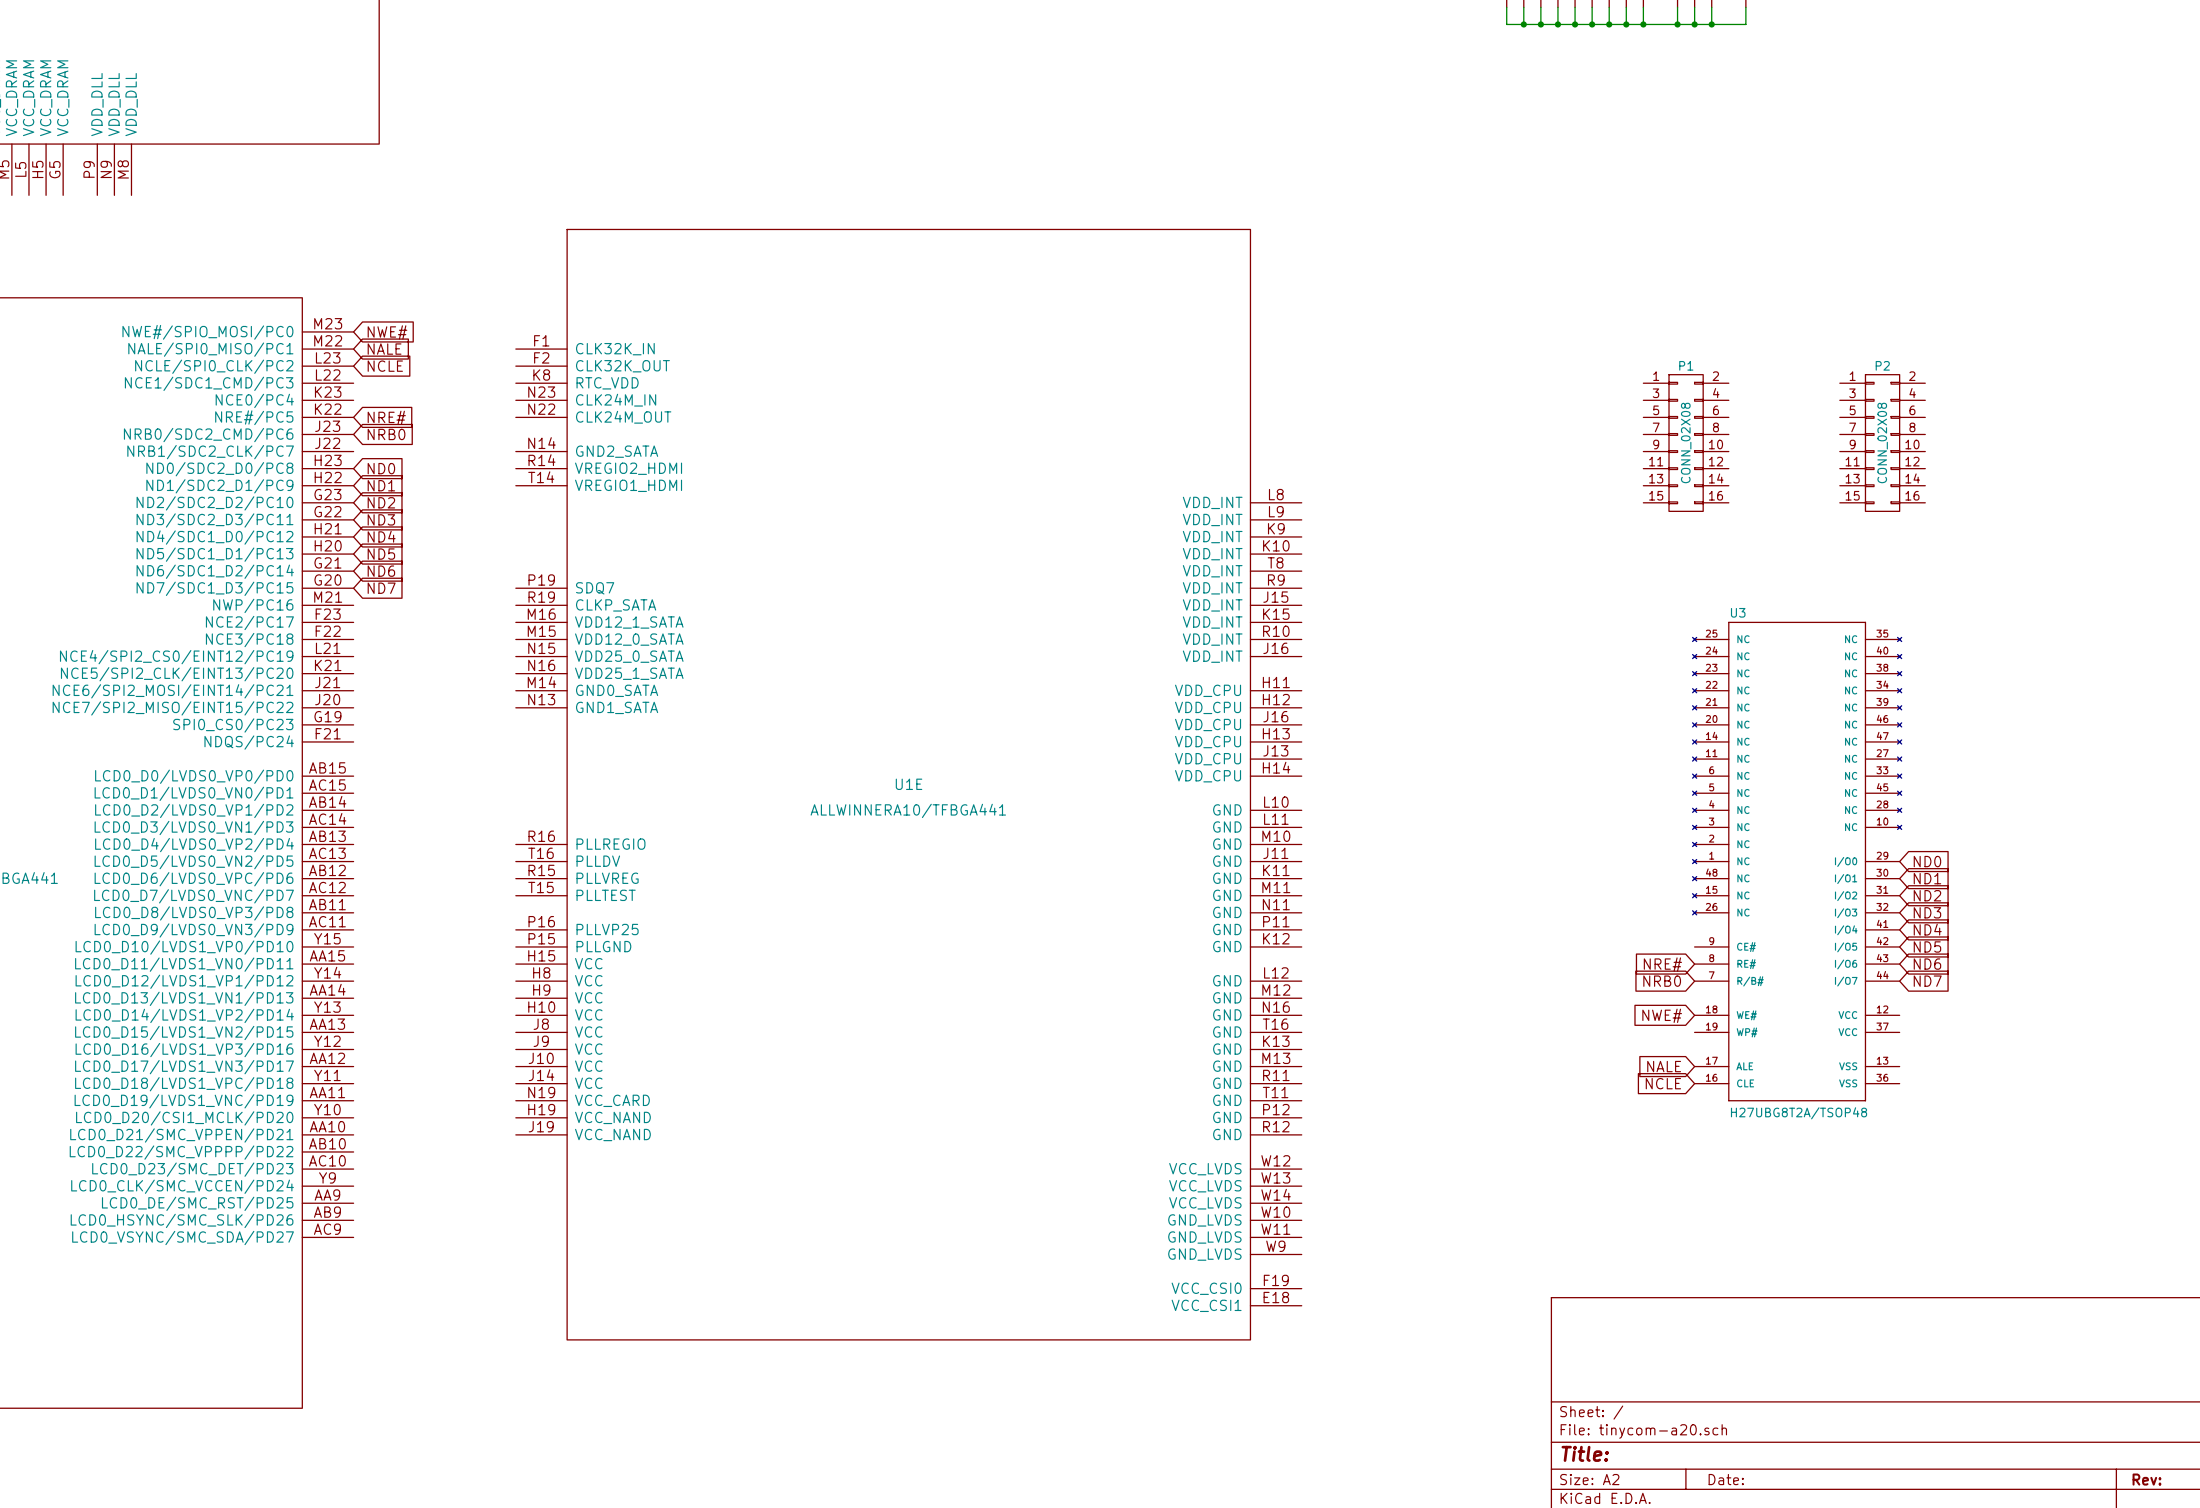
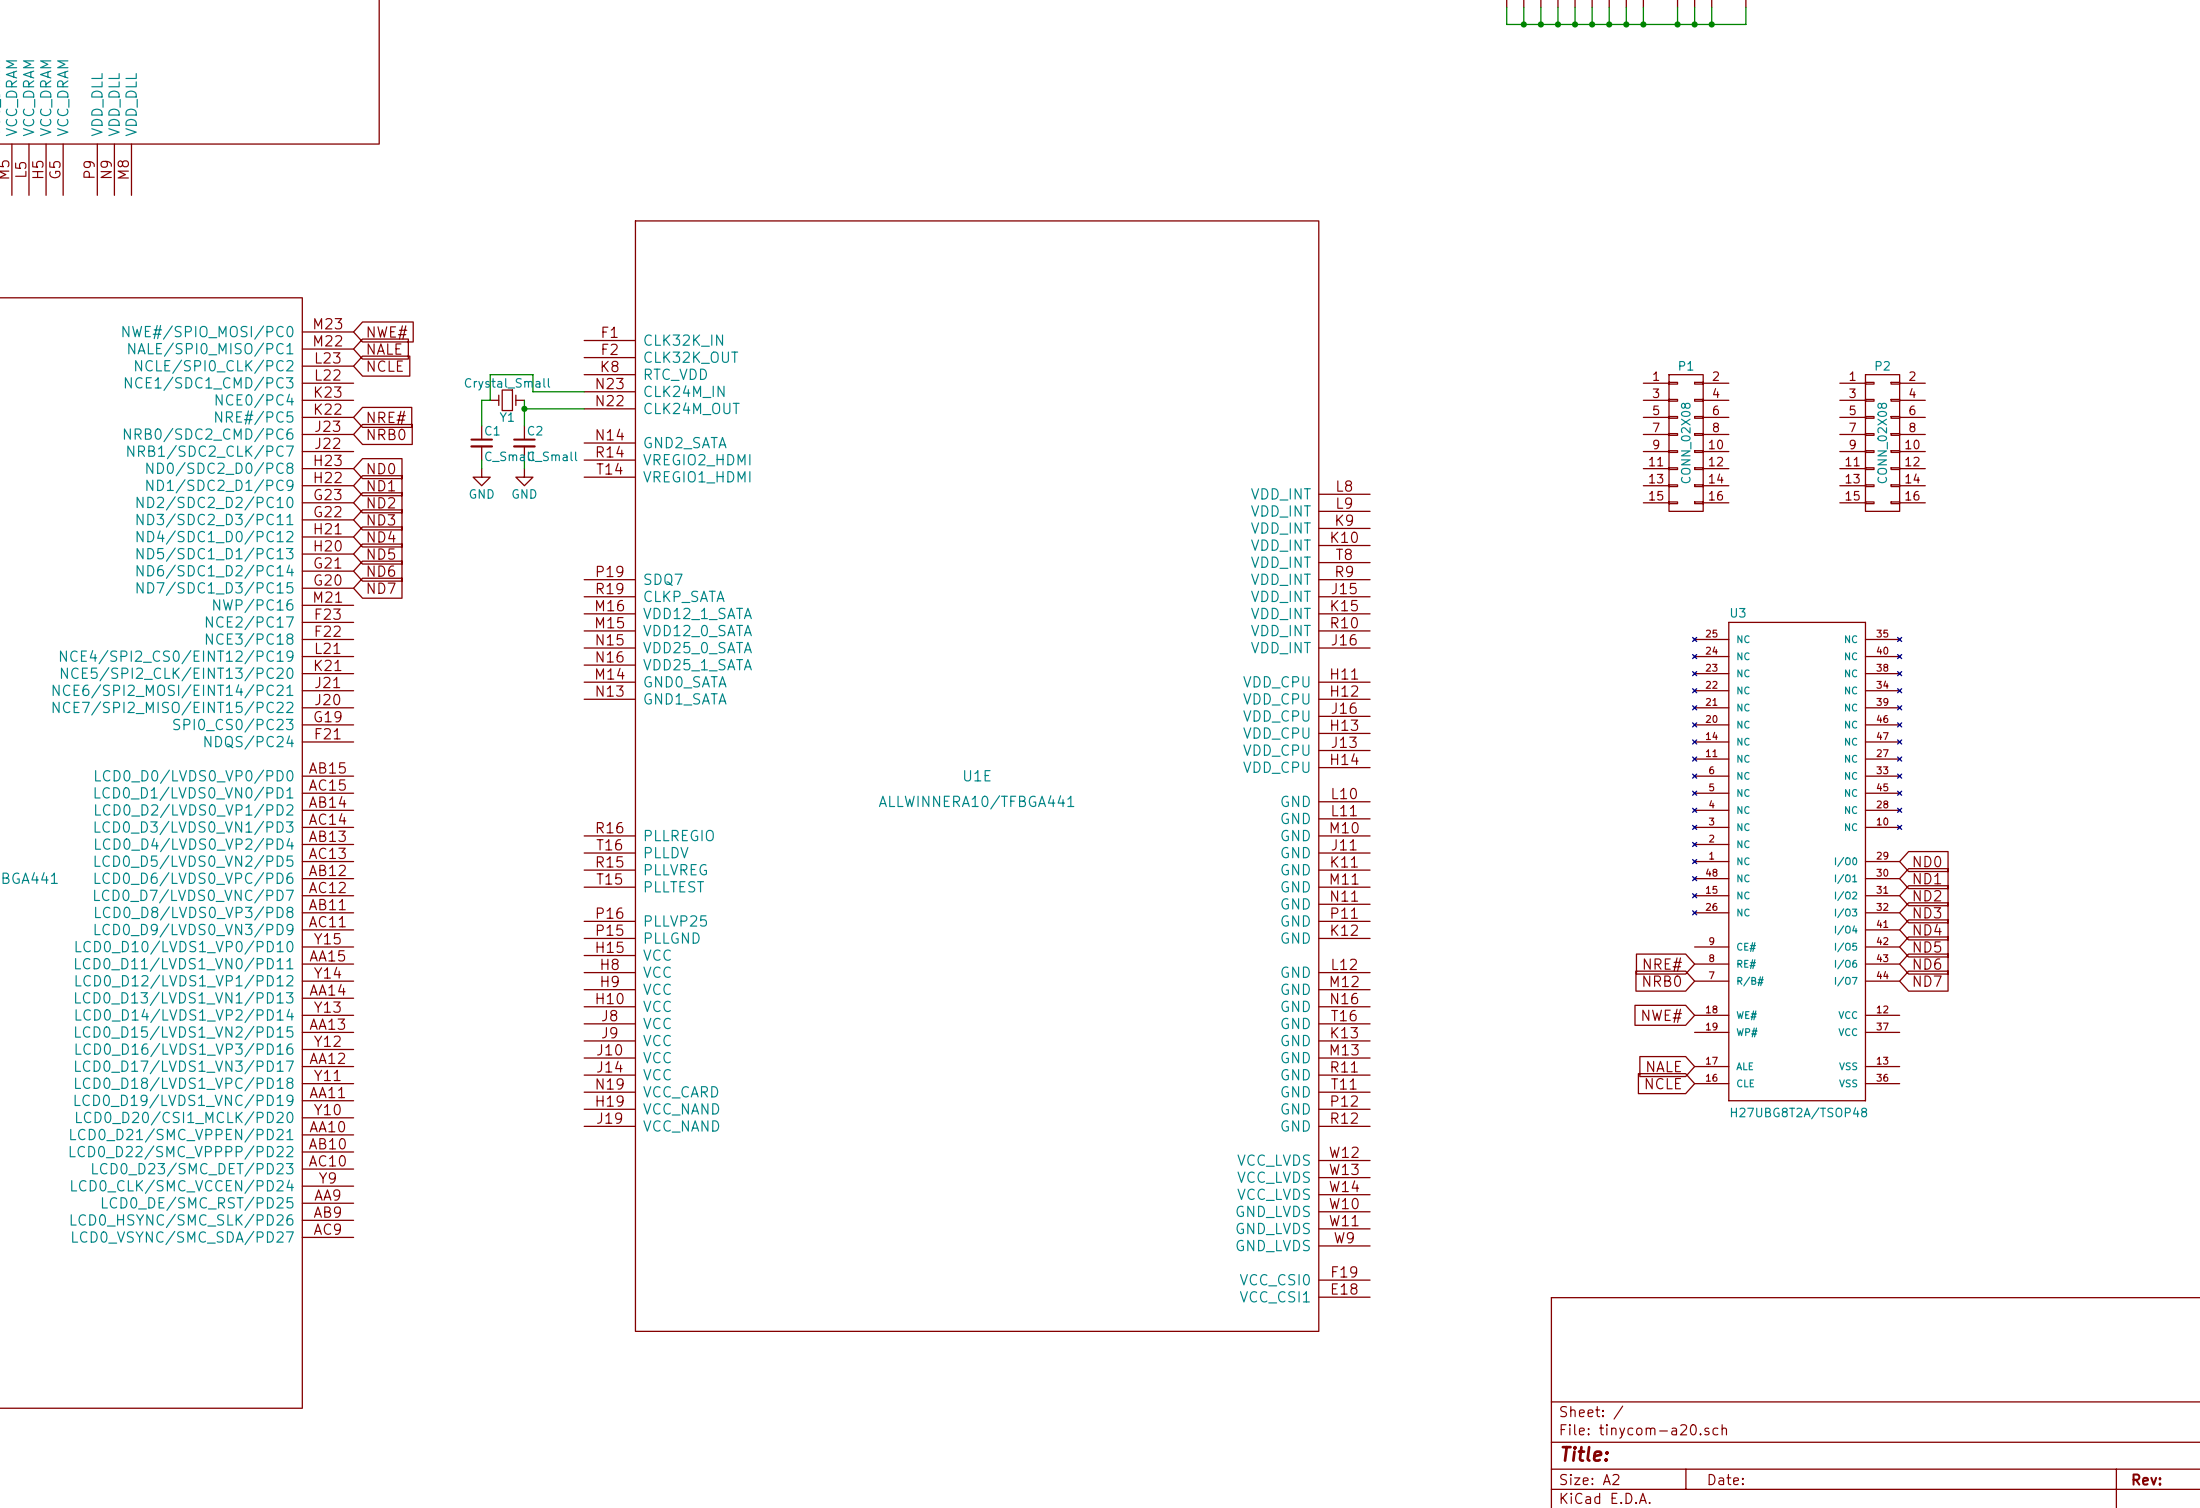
wire: none -> (584, 391) (532, 391) (532, 374) (490, 374) (490, 400) (481, 400) (481, 425)
Y1: none -> Crystal_Small (507, 400)
wire: none -> (524, 400) (524, 425)
wire: none -> (524, 408) (584, 408)
junction: none -> (524, 408)
C1: none -> C_Small (481, 443)
C2: none -> C_Small (524, 443)
wire: none -> (481, 460) (481, 468)
wire: none -> (524, 460) (524, 468)
power symbol: none -> GND (481, 477)
power symbol: none -> GND (524, 477)
U1E position: (908, 784) -> (977, 776)

